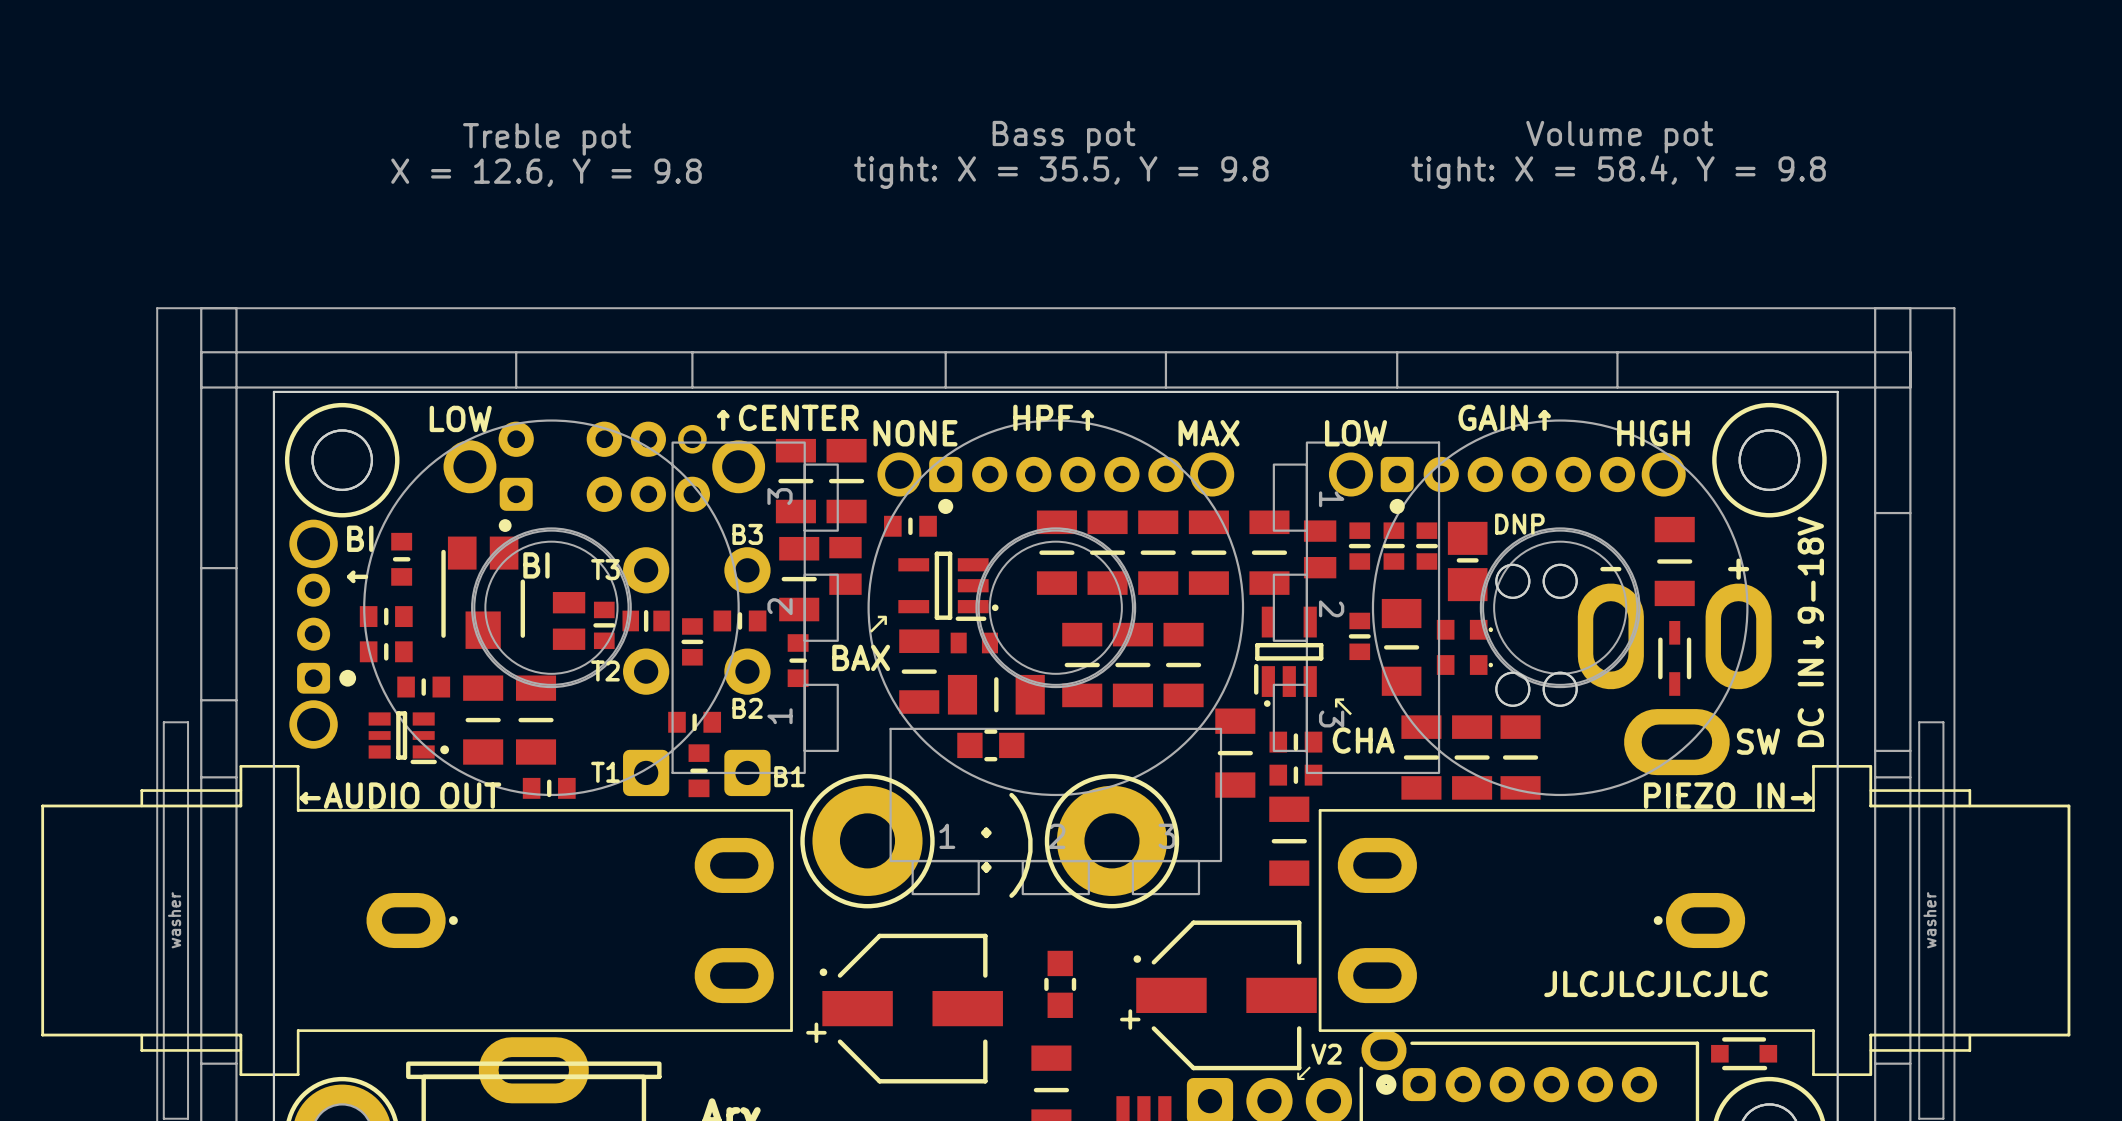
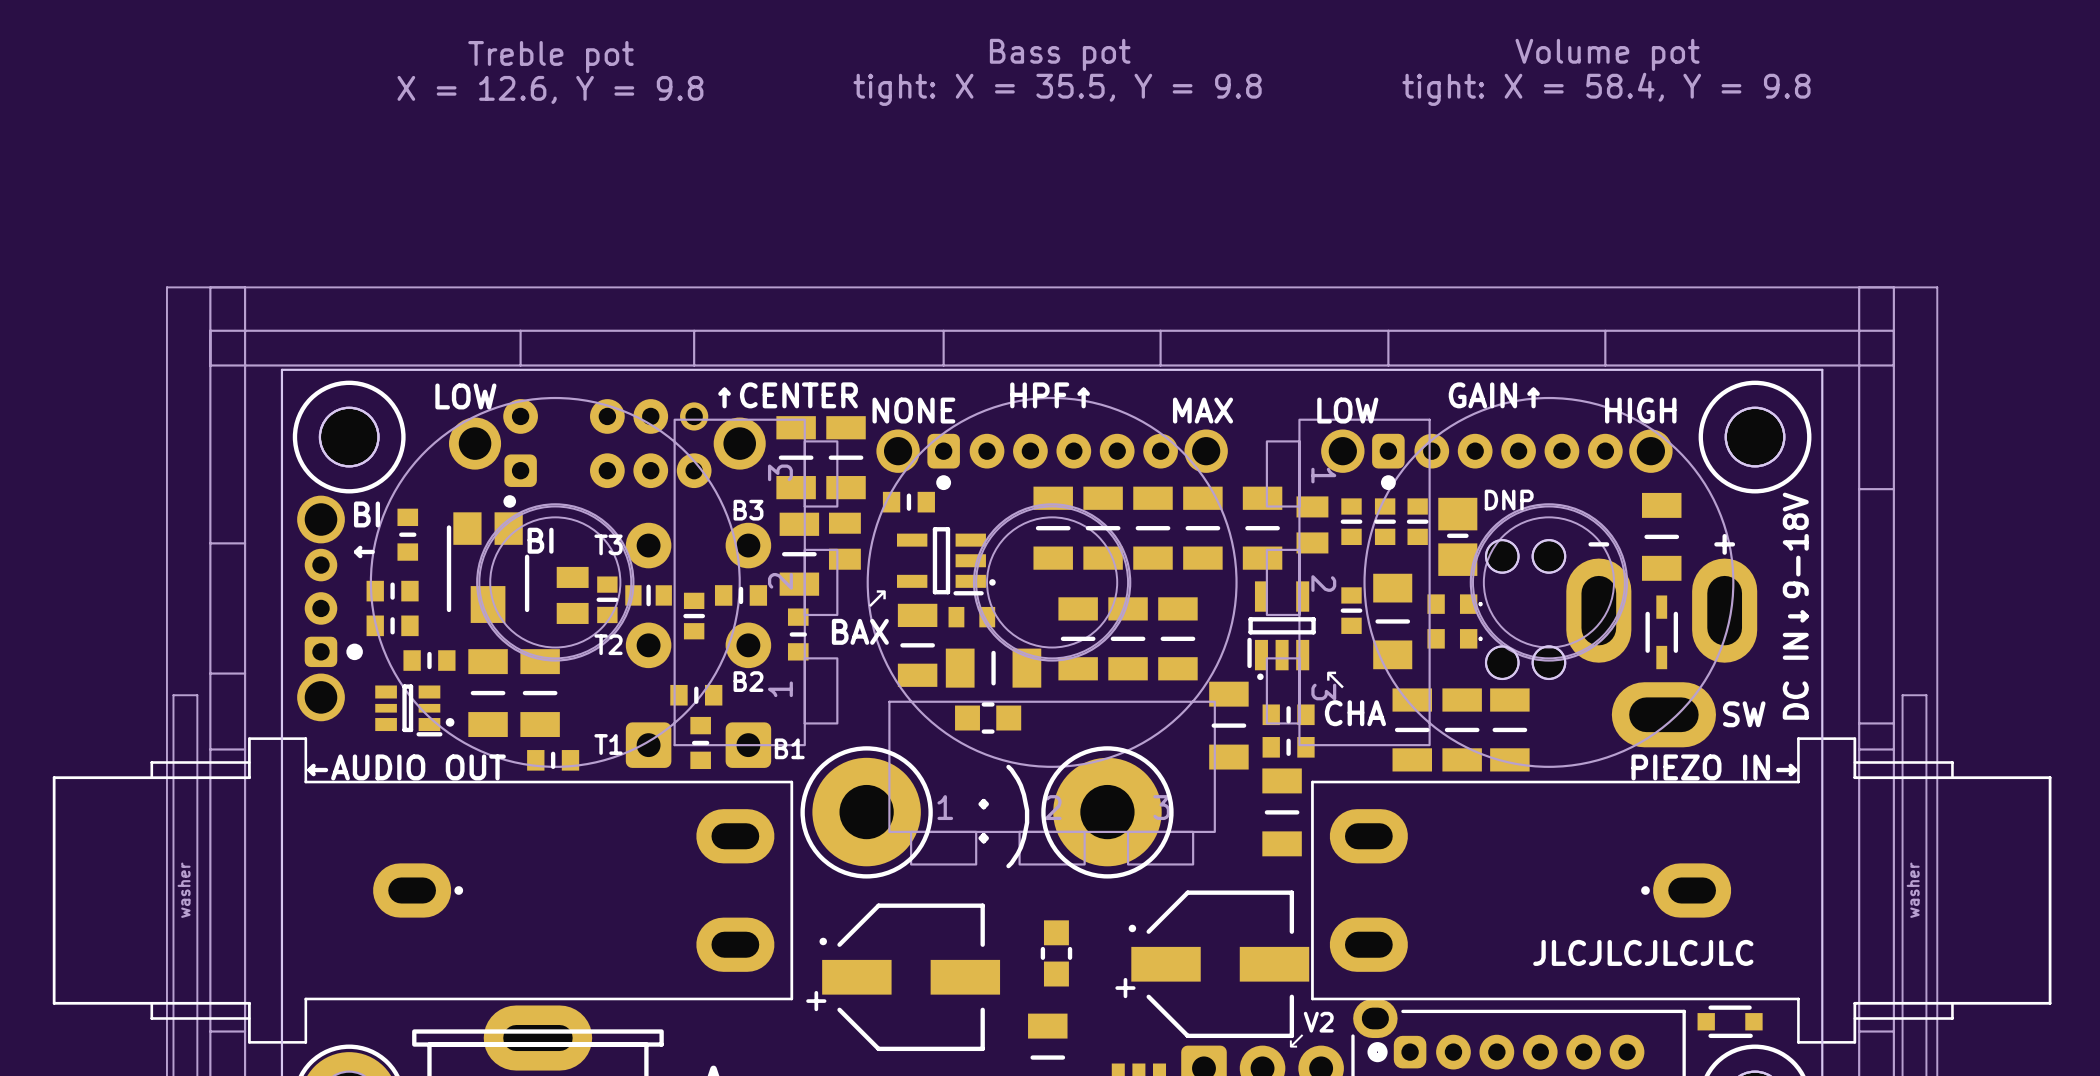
text position: Bass pot (1064, 137) -> Bass pot (1060, 54)
text position: Volume pot (1619, 137) -> Volume pot (1607, 54)
text position: Treble pot (547, 139) -> Treble pot (550, 57)
text position: X = 12.6, Y = 9.8 (546, 172) -> X = 12.6, Y = 9.8 (550, 89)
text position: tight: X = 35.5, Y = 9.8 (1061, 172) -> tight: X = 35.5, Y = 9.8 (1057, 89)
text position: tight: X = 58.4, Y = 9.8 (1618, 172) -> tight: X = 58.4, Y = 9.8 (1606, 89)

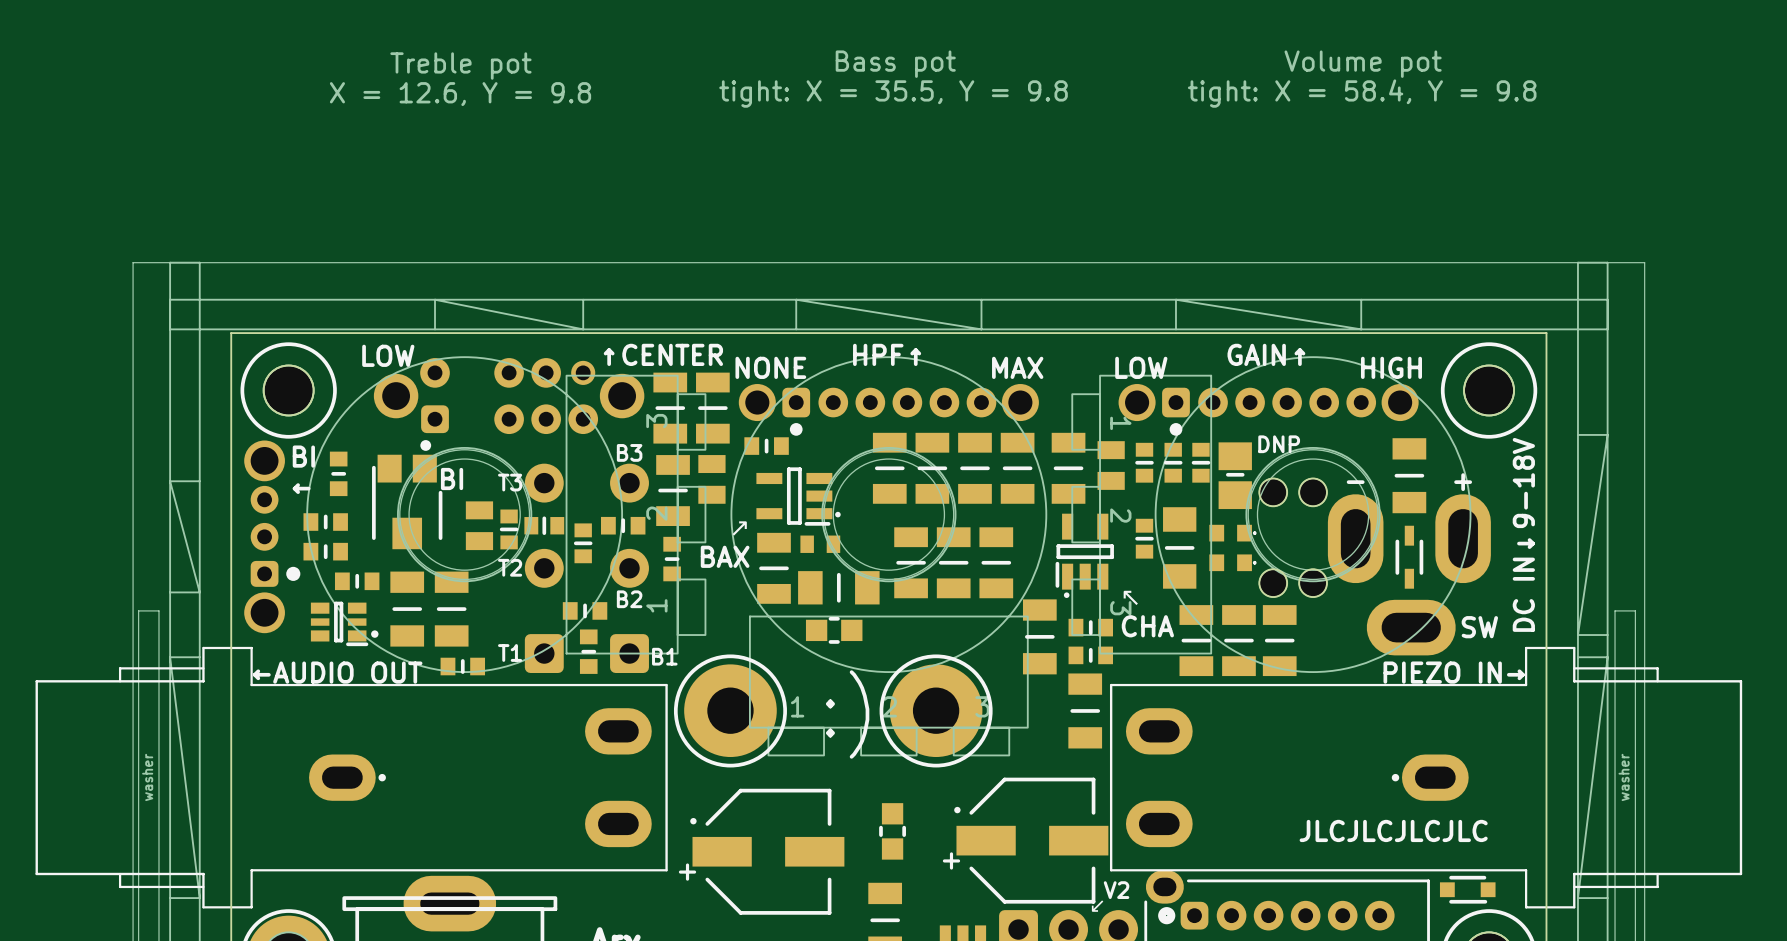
line: none -> (435, 299) (583, 329)
line: none -> (796, 299) (981, 329)
line: none -> (1175, 299) (1361, 329)
line: none -> (1607, 434) (1577, 635)
line: none -> (170, 481) (199, 592)
line: none -> (170, 657) (199, 898)
line: none -> (1607, 657) (1577, 898)

